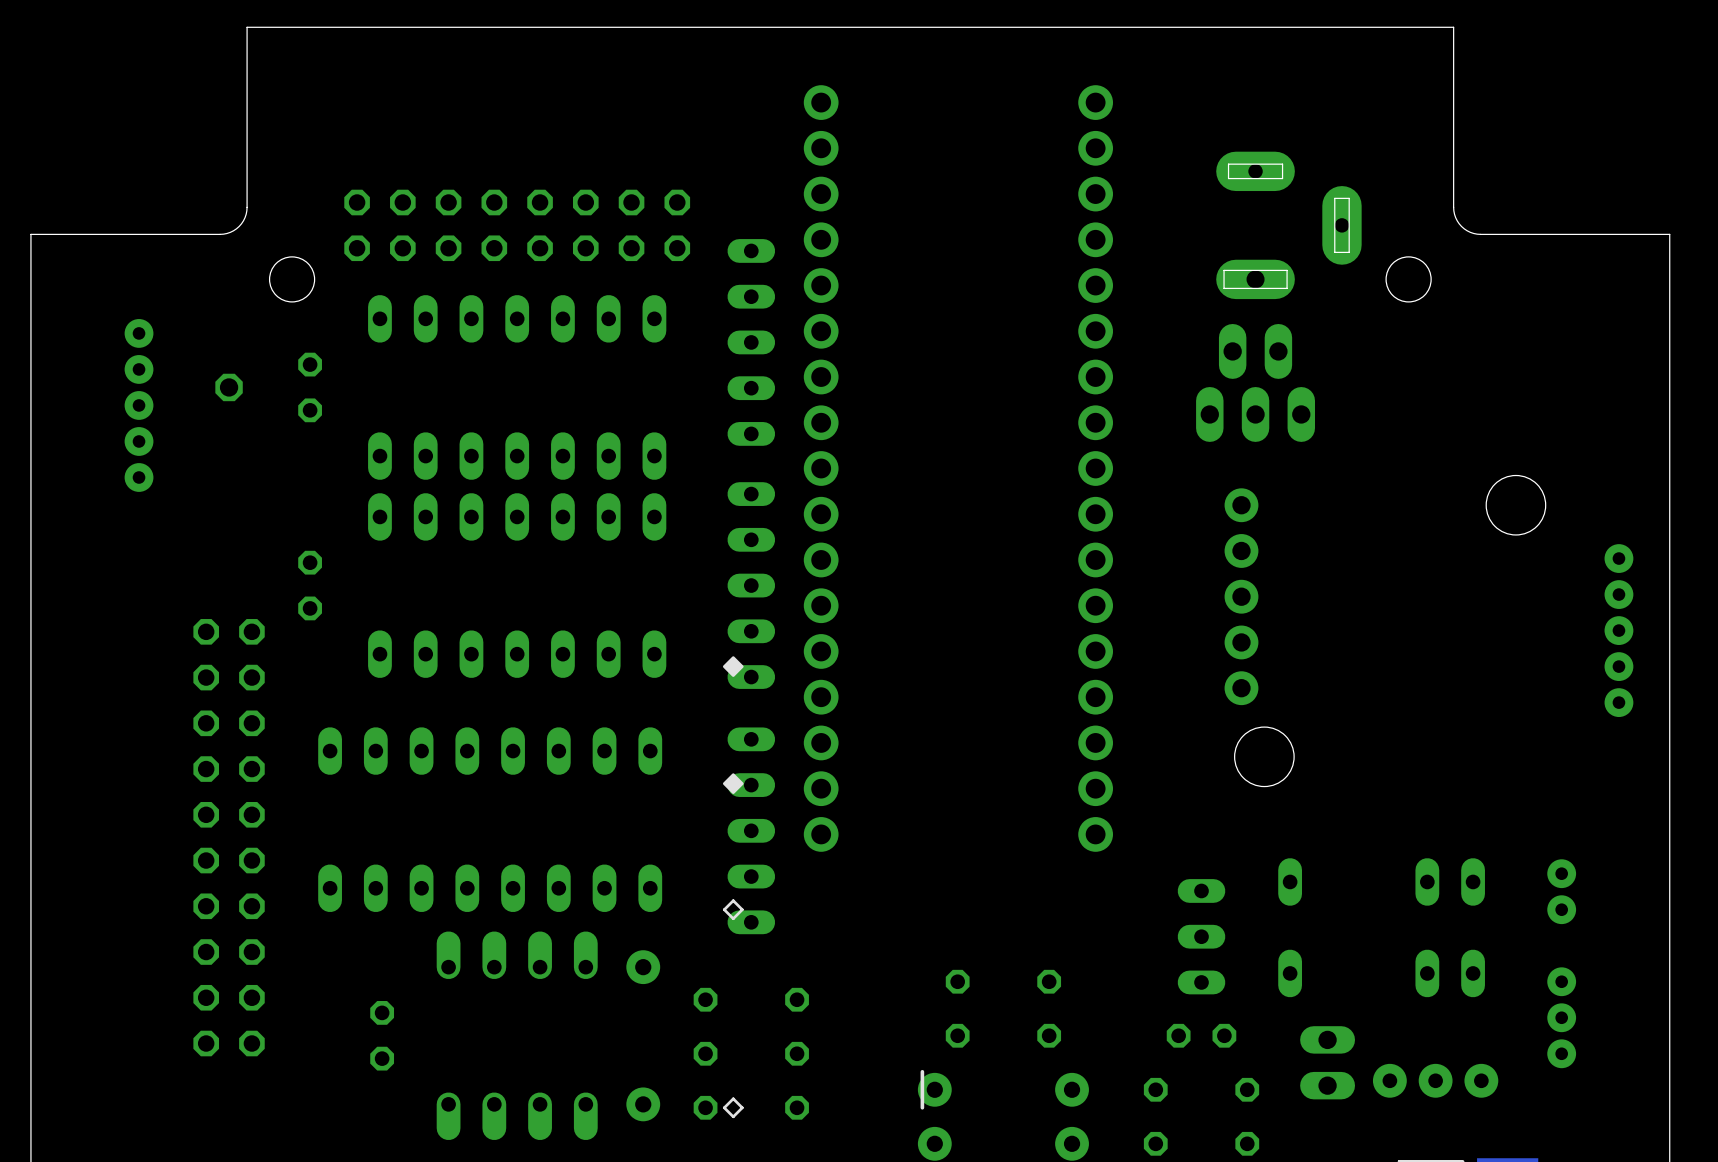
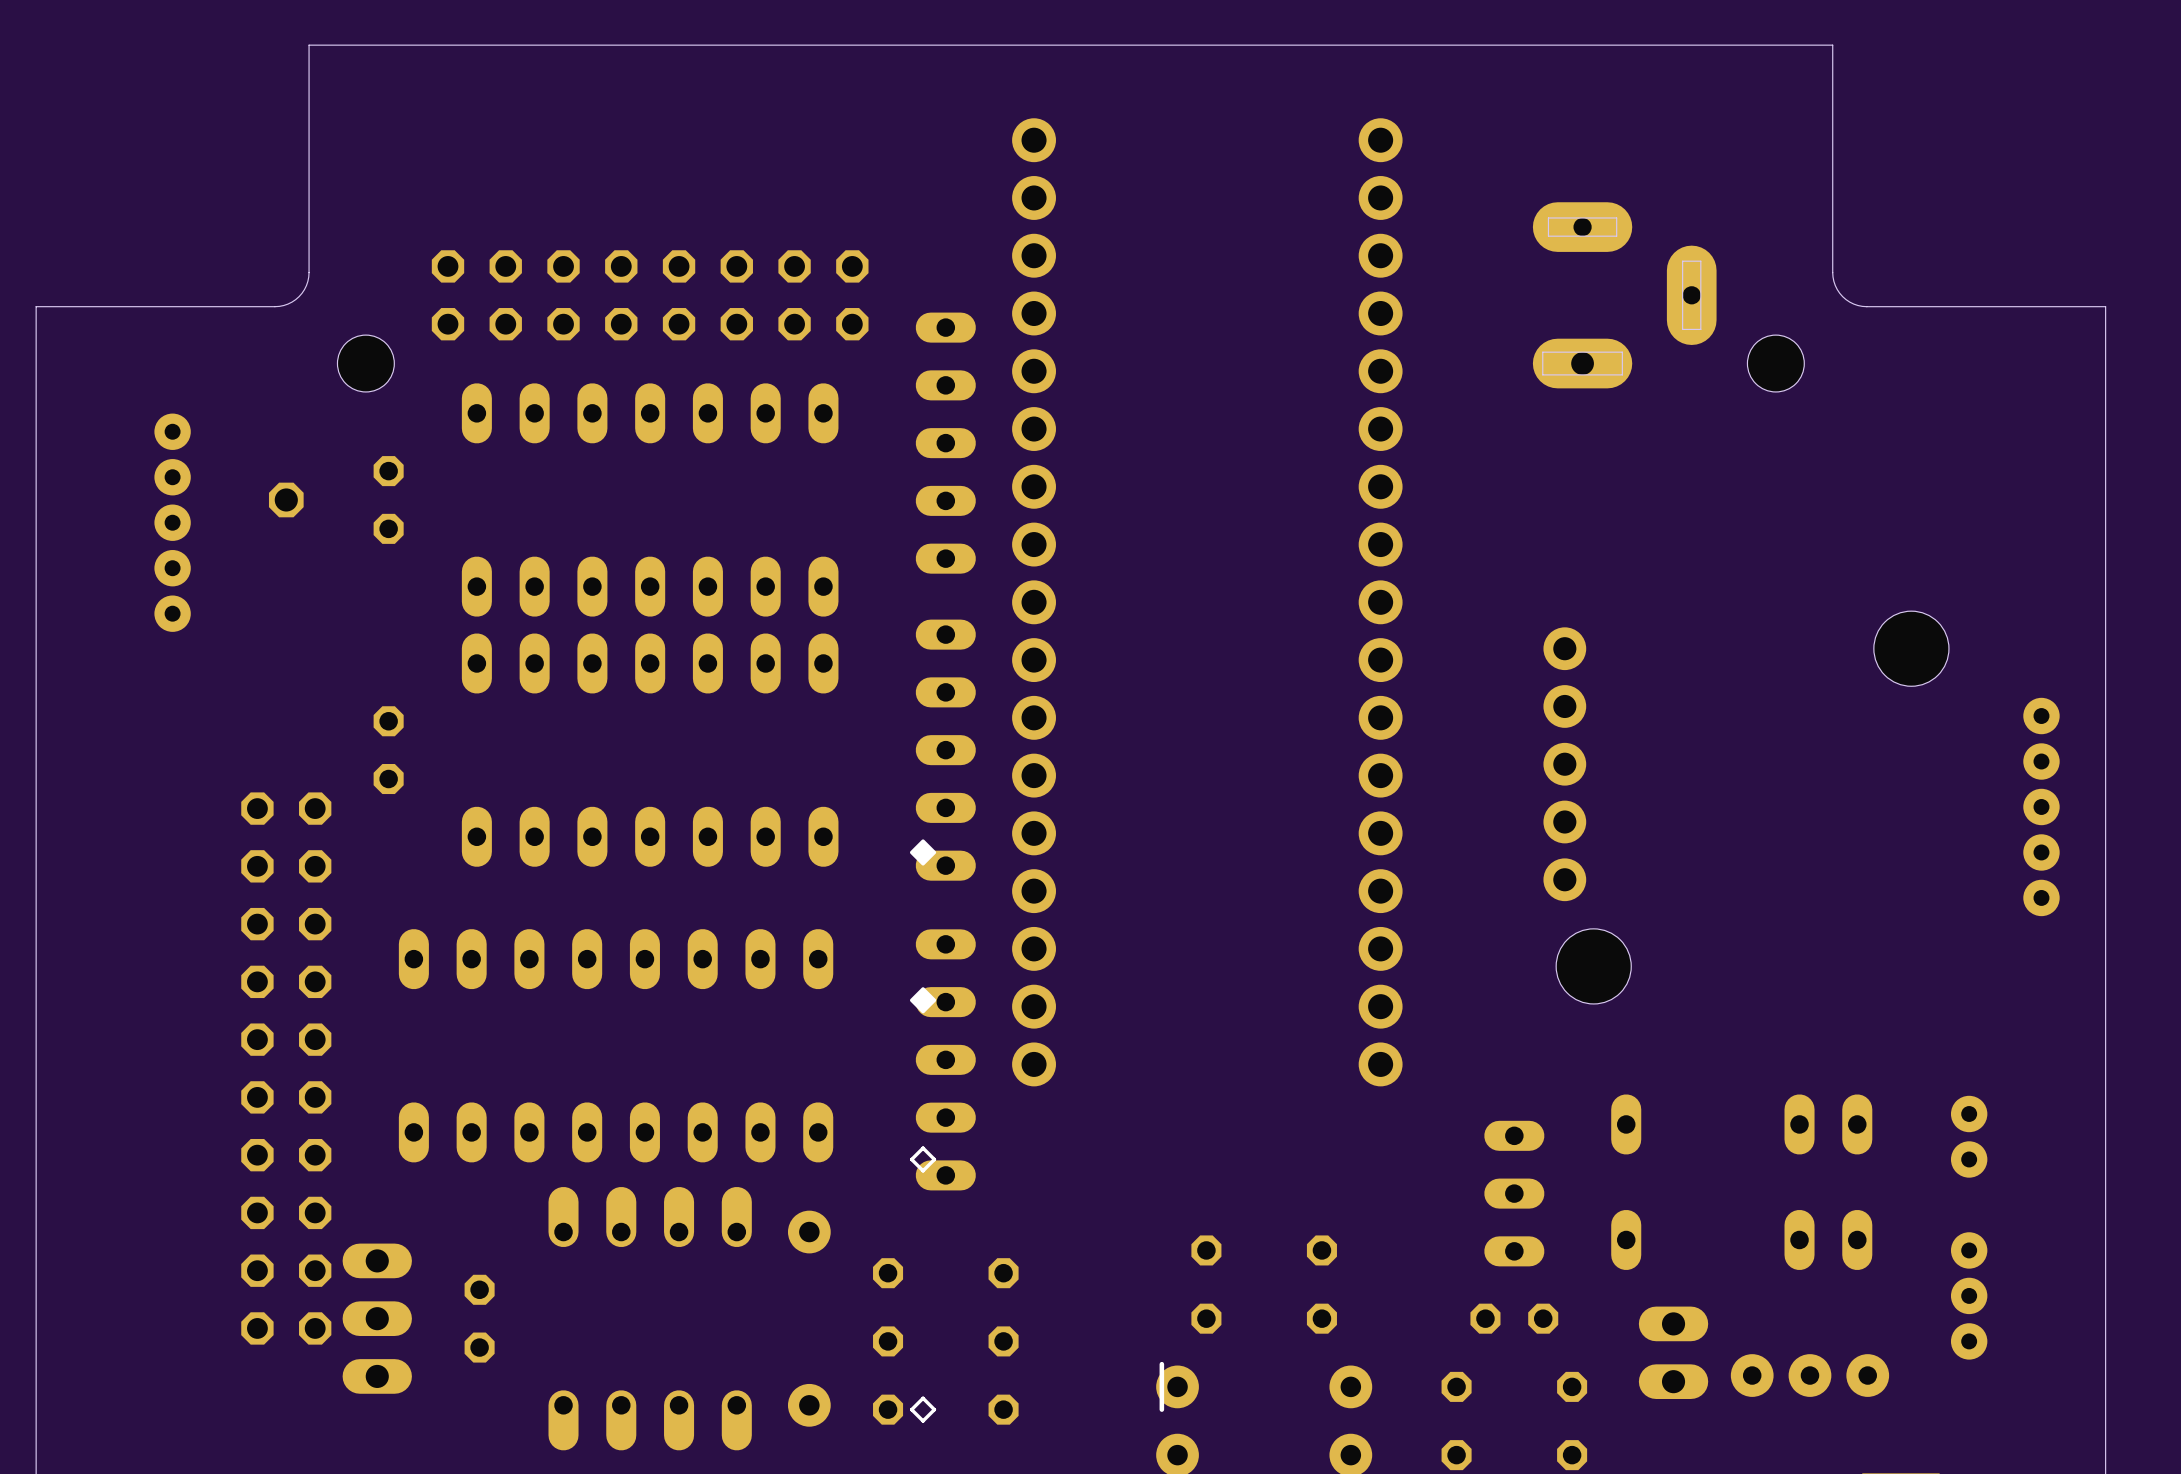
part: (1255, 351) -> none
part: (1255, 414) -> none
part: none -> (377, 1318)

